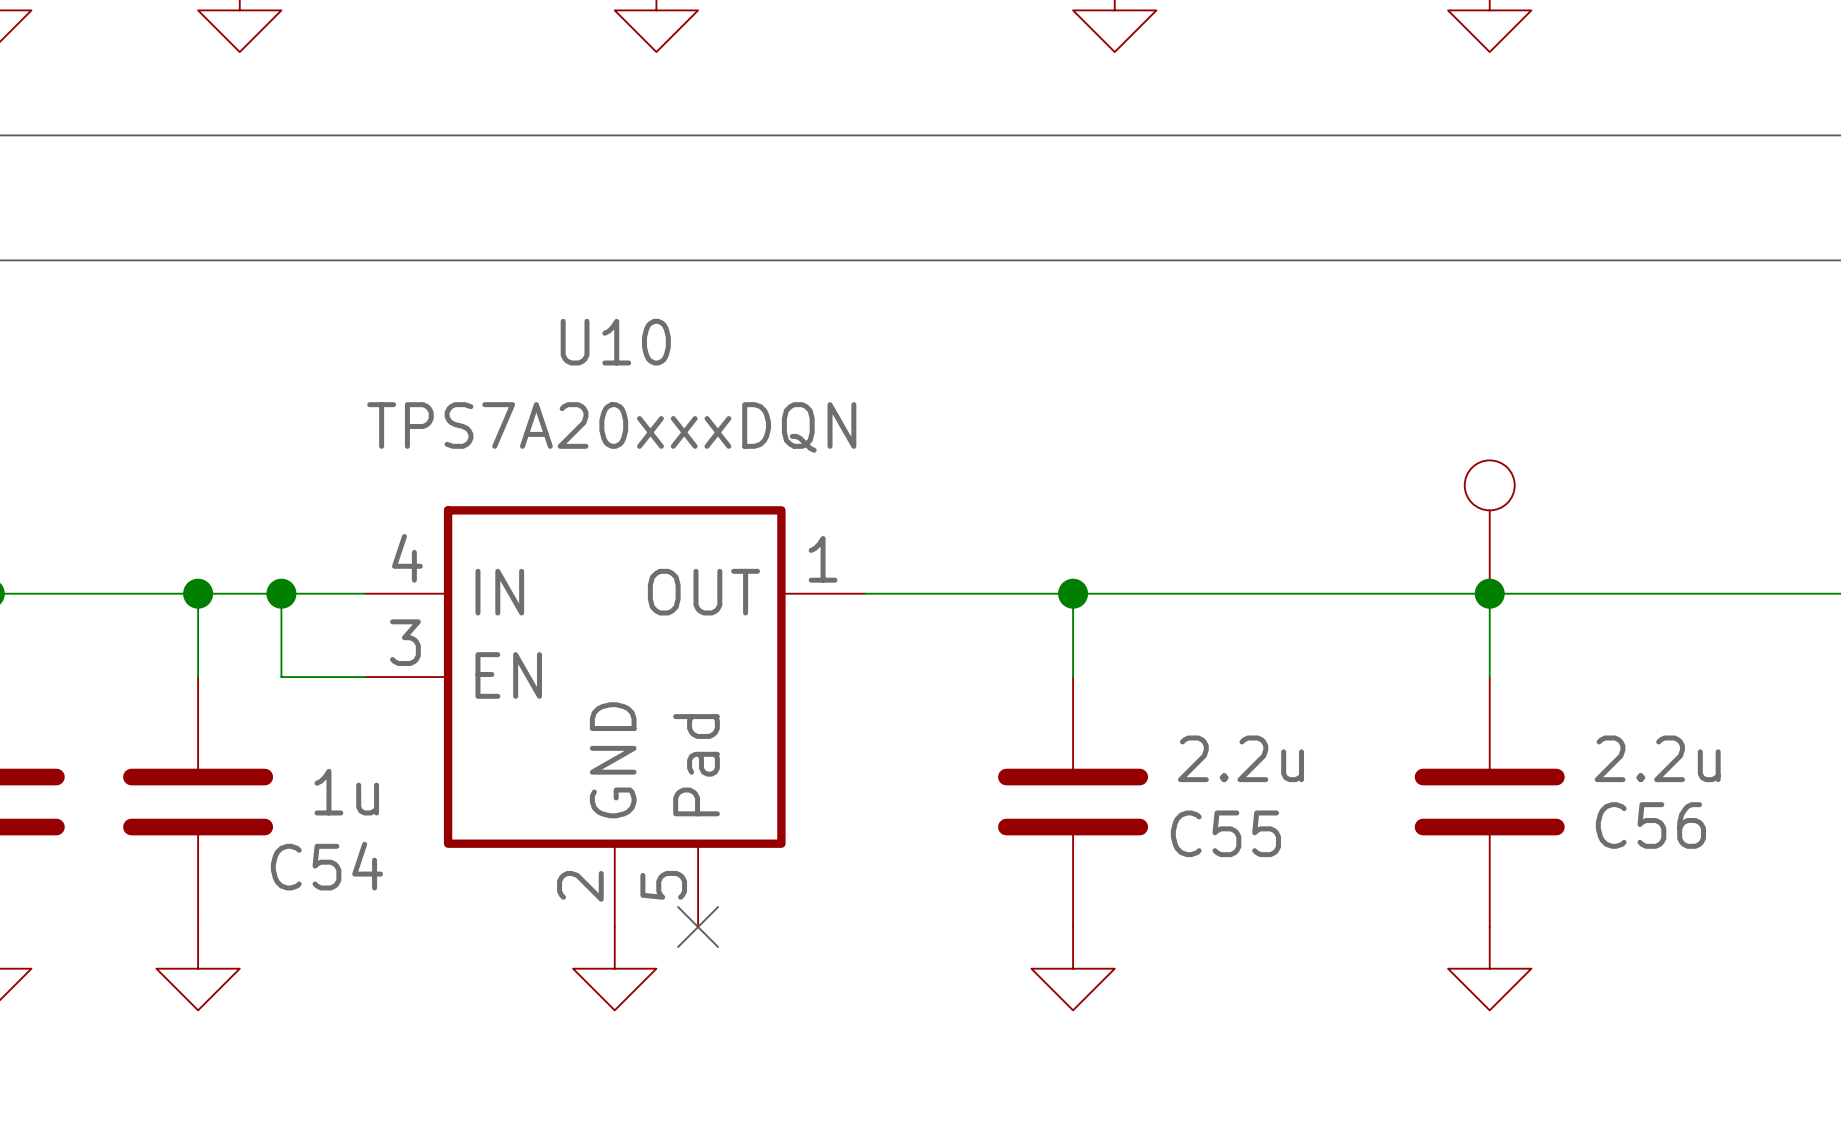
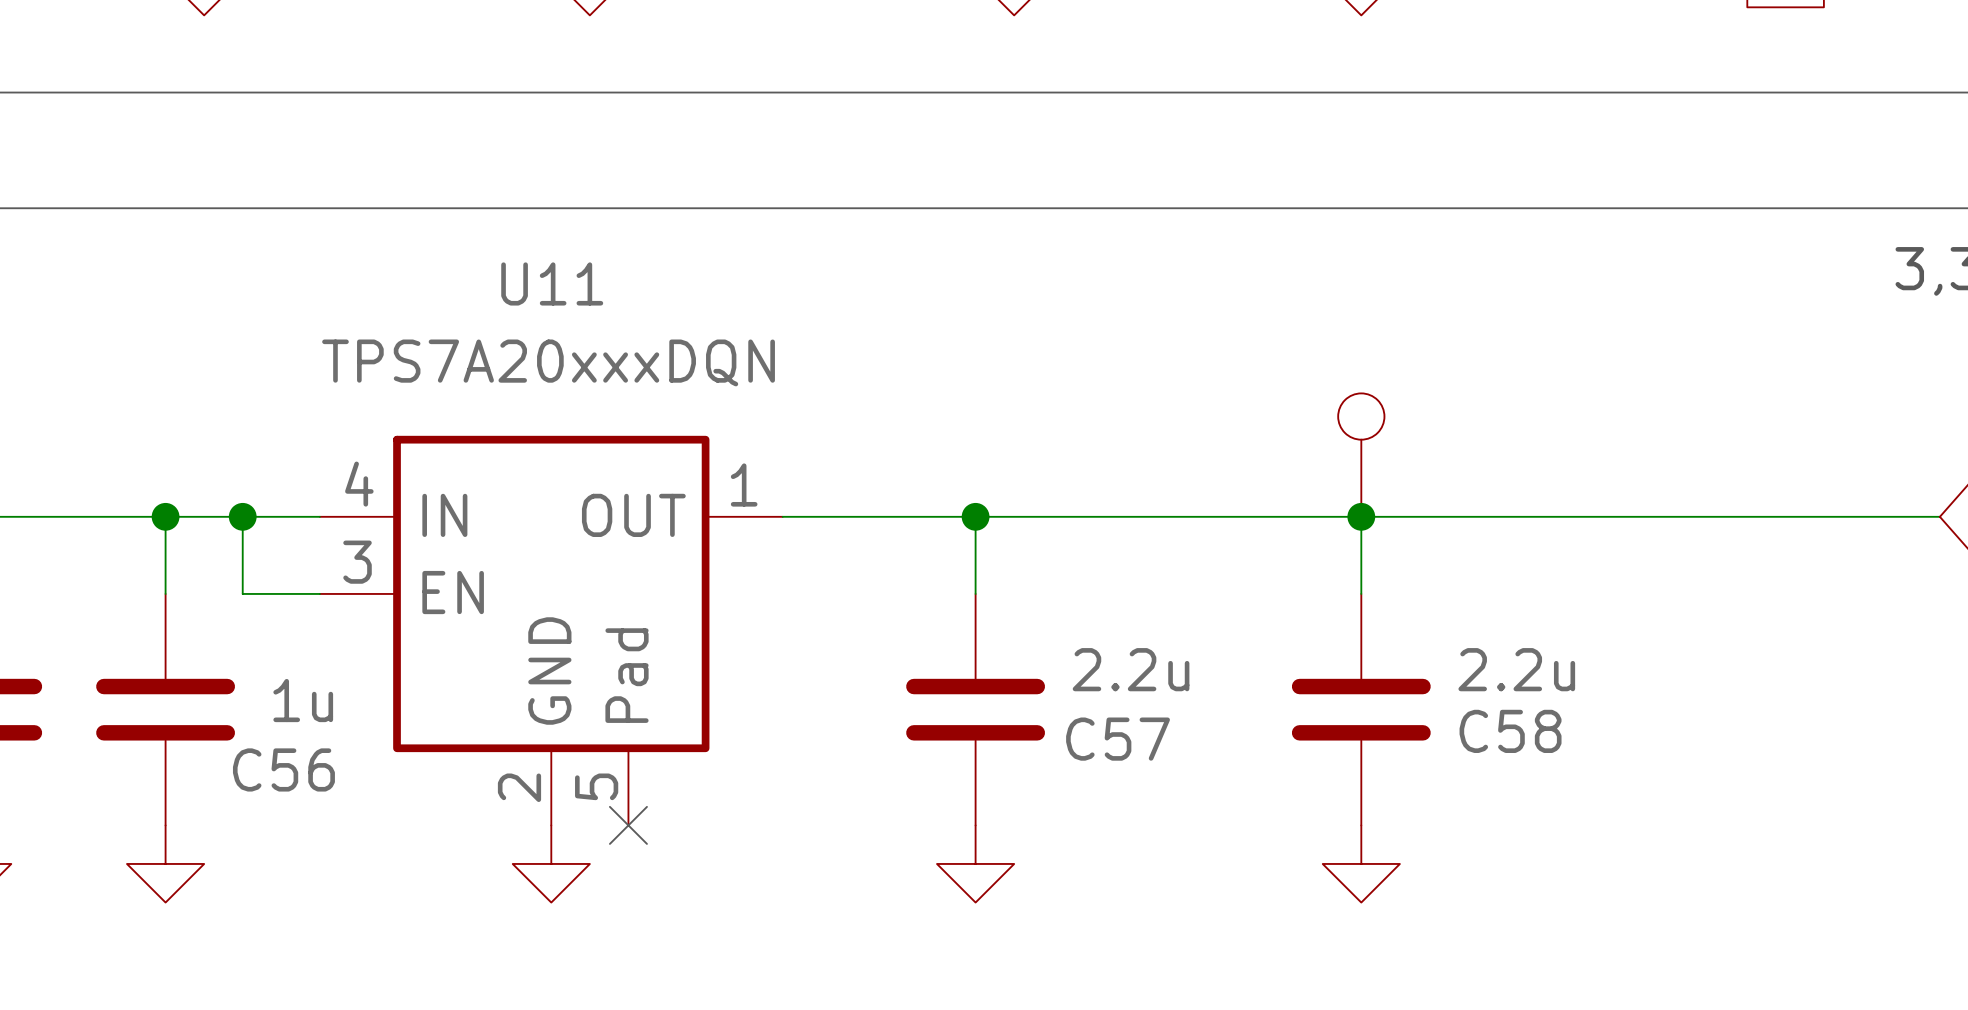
U10 name: U10 (615, 342) -> U11 (552, 283)
C56 name: C56 (1650, 825) -> C58 (1510, 731)
C55 name: C55 (1225, 833) -> C57 (1118, 739)
C54 name: C54 (326, 866) -> C56 (283, 769)

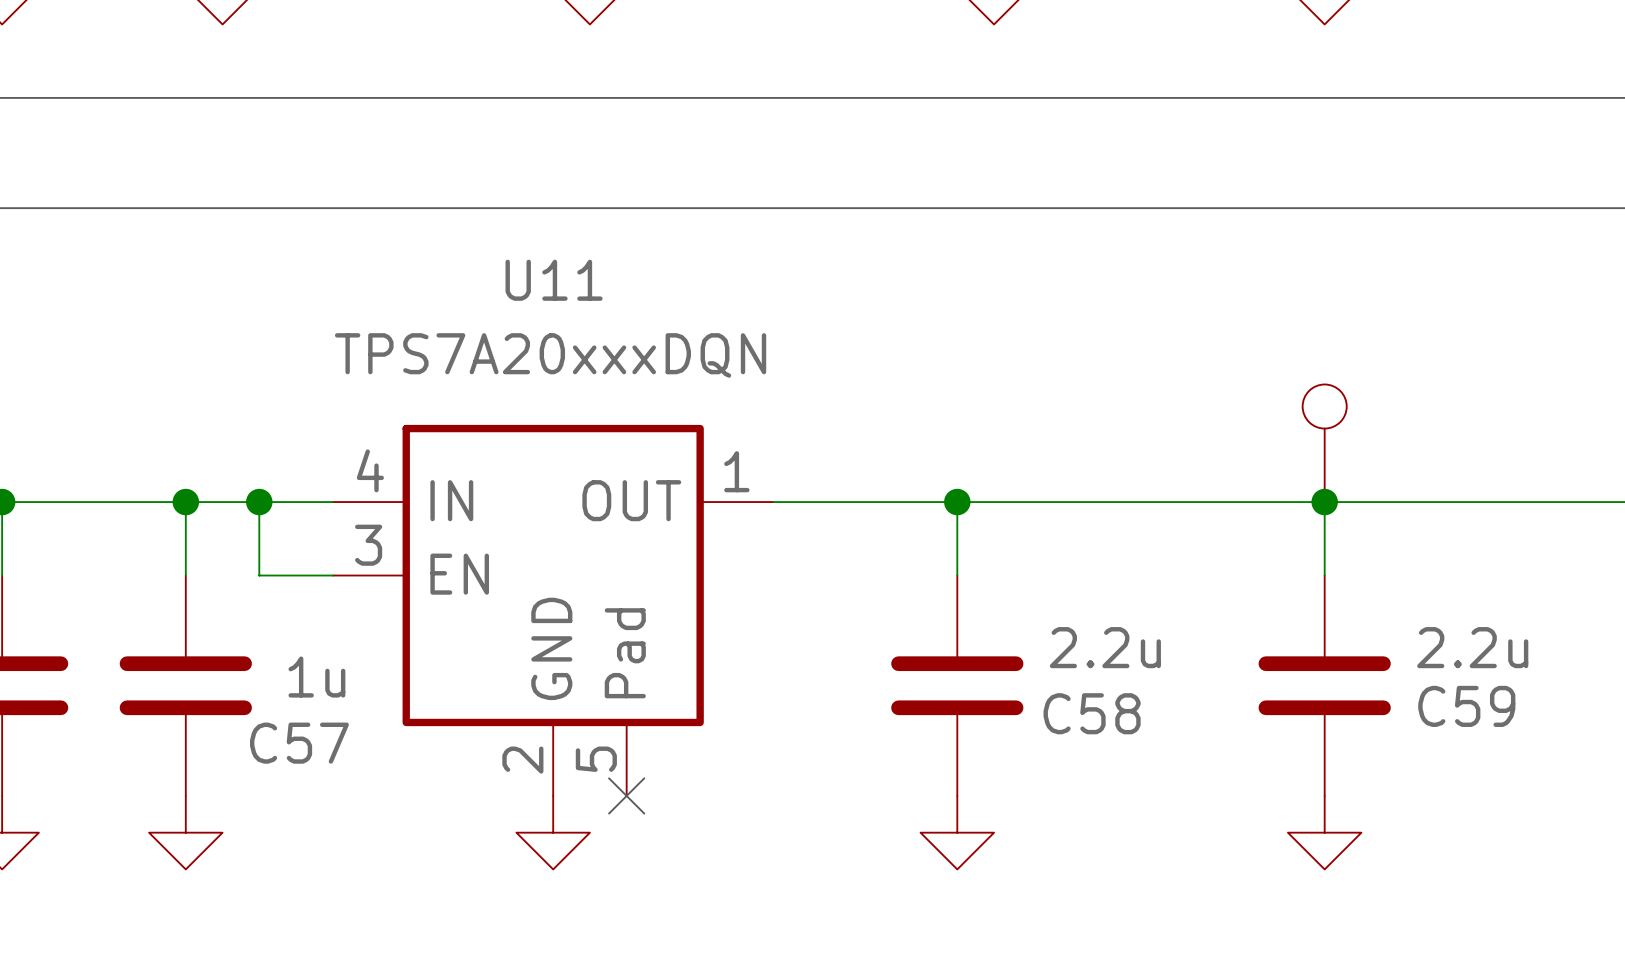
C58 name: C58 (1510, 731) -> C59 (1466, 706)
C57 name: C57 (1118, 739) -> C58 (1092, 713)
C56 name: C56 (283, 769) -> C57 (299, 743)

